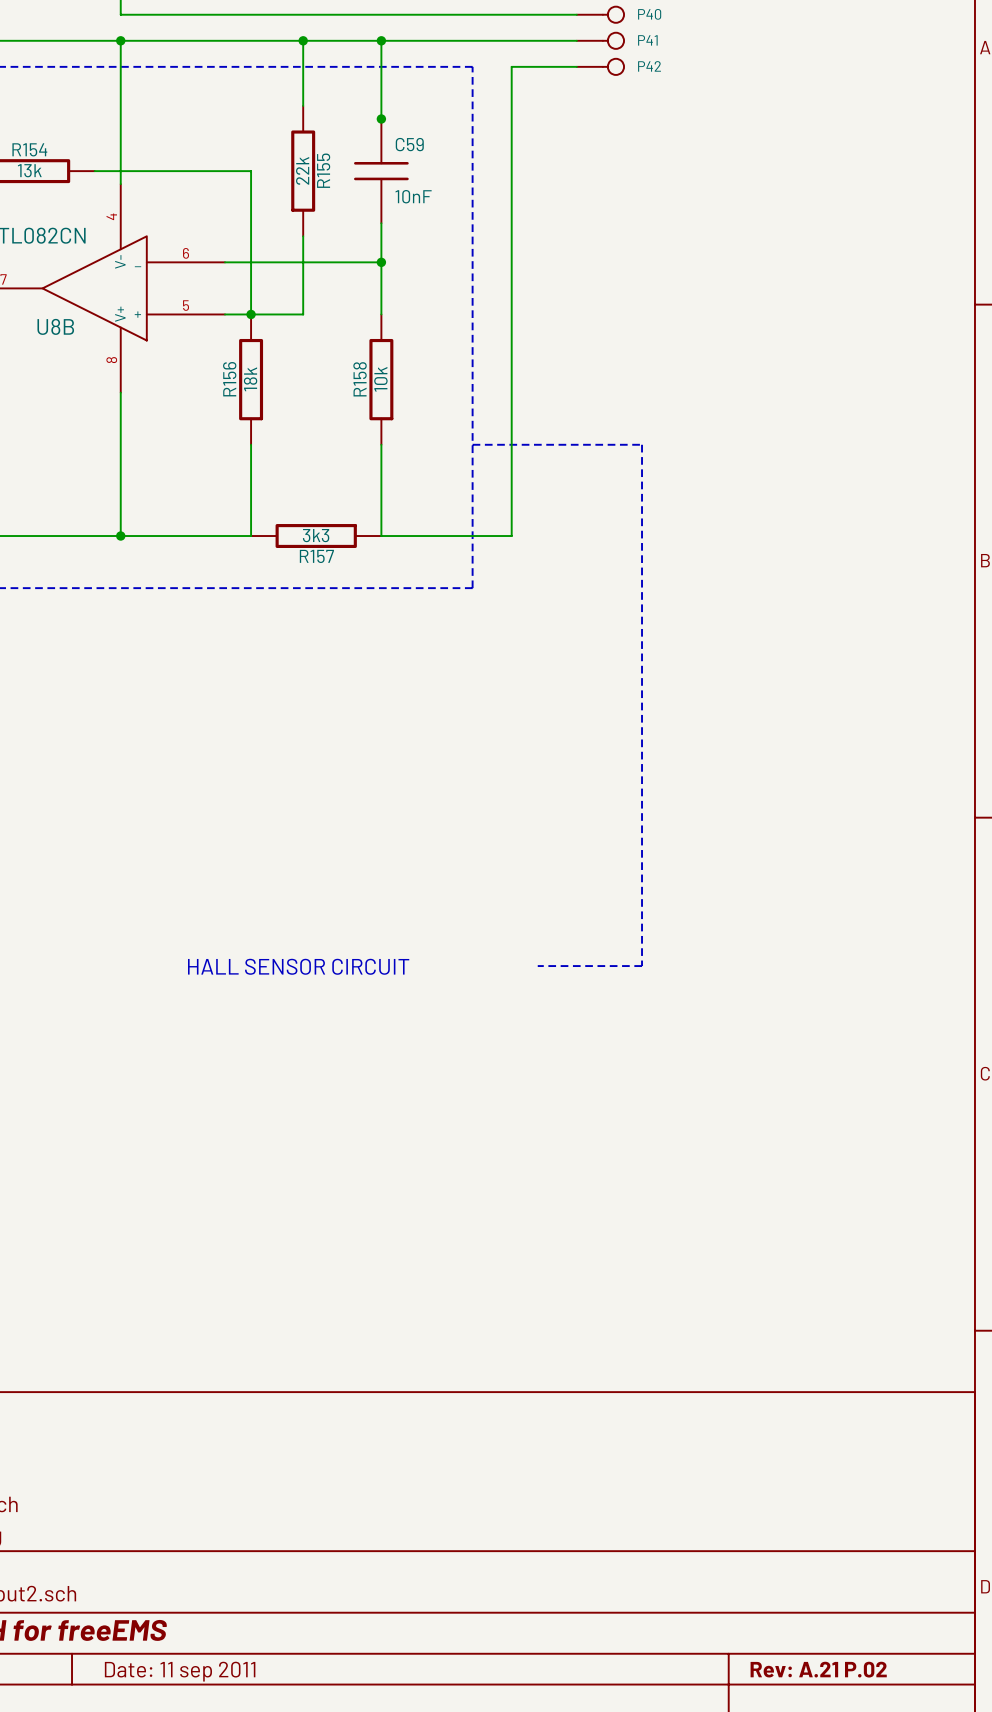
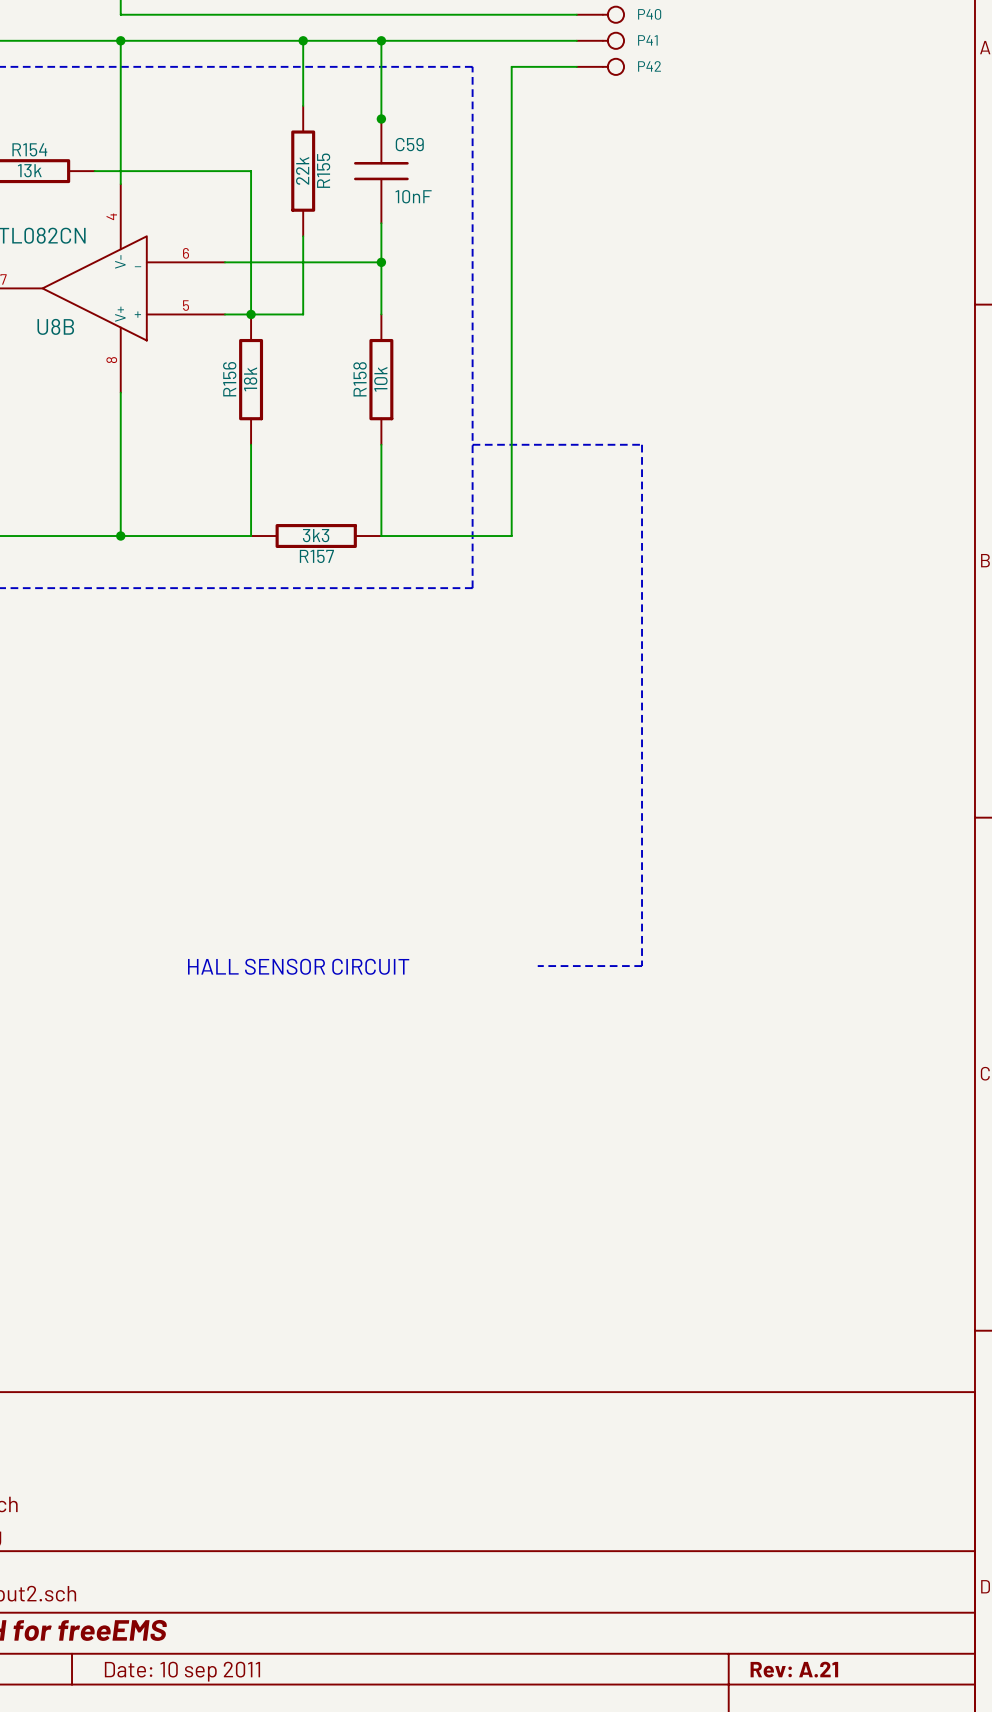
title block: Rev: A.21 P.02 (818, 1669) -> Rev: A.21 (794, 1669)
title block: Date: 11 sep 2011 (180, 1671) -> Date: 10 sep 2011 (182, 1671)

